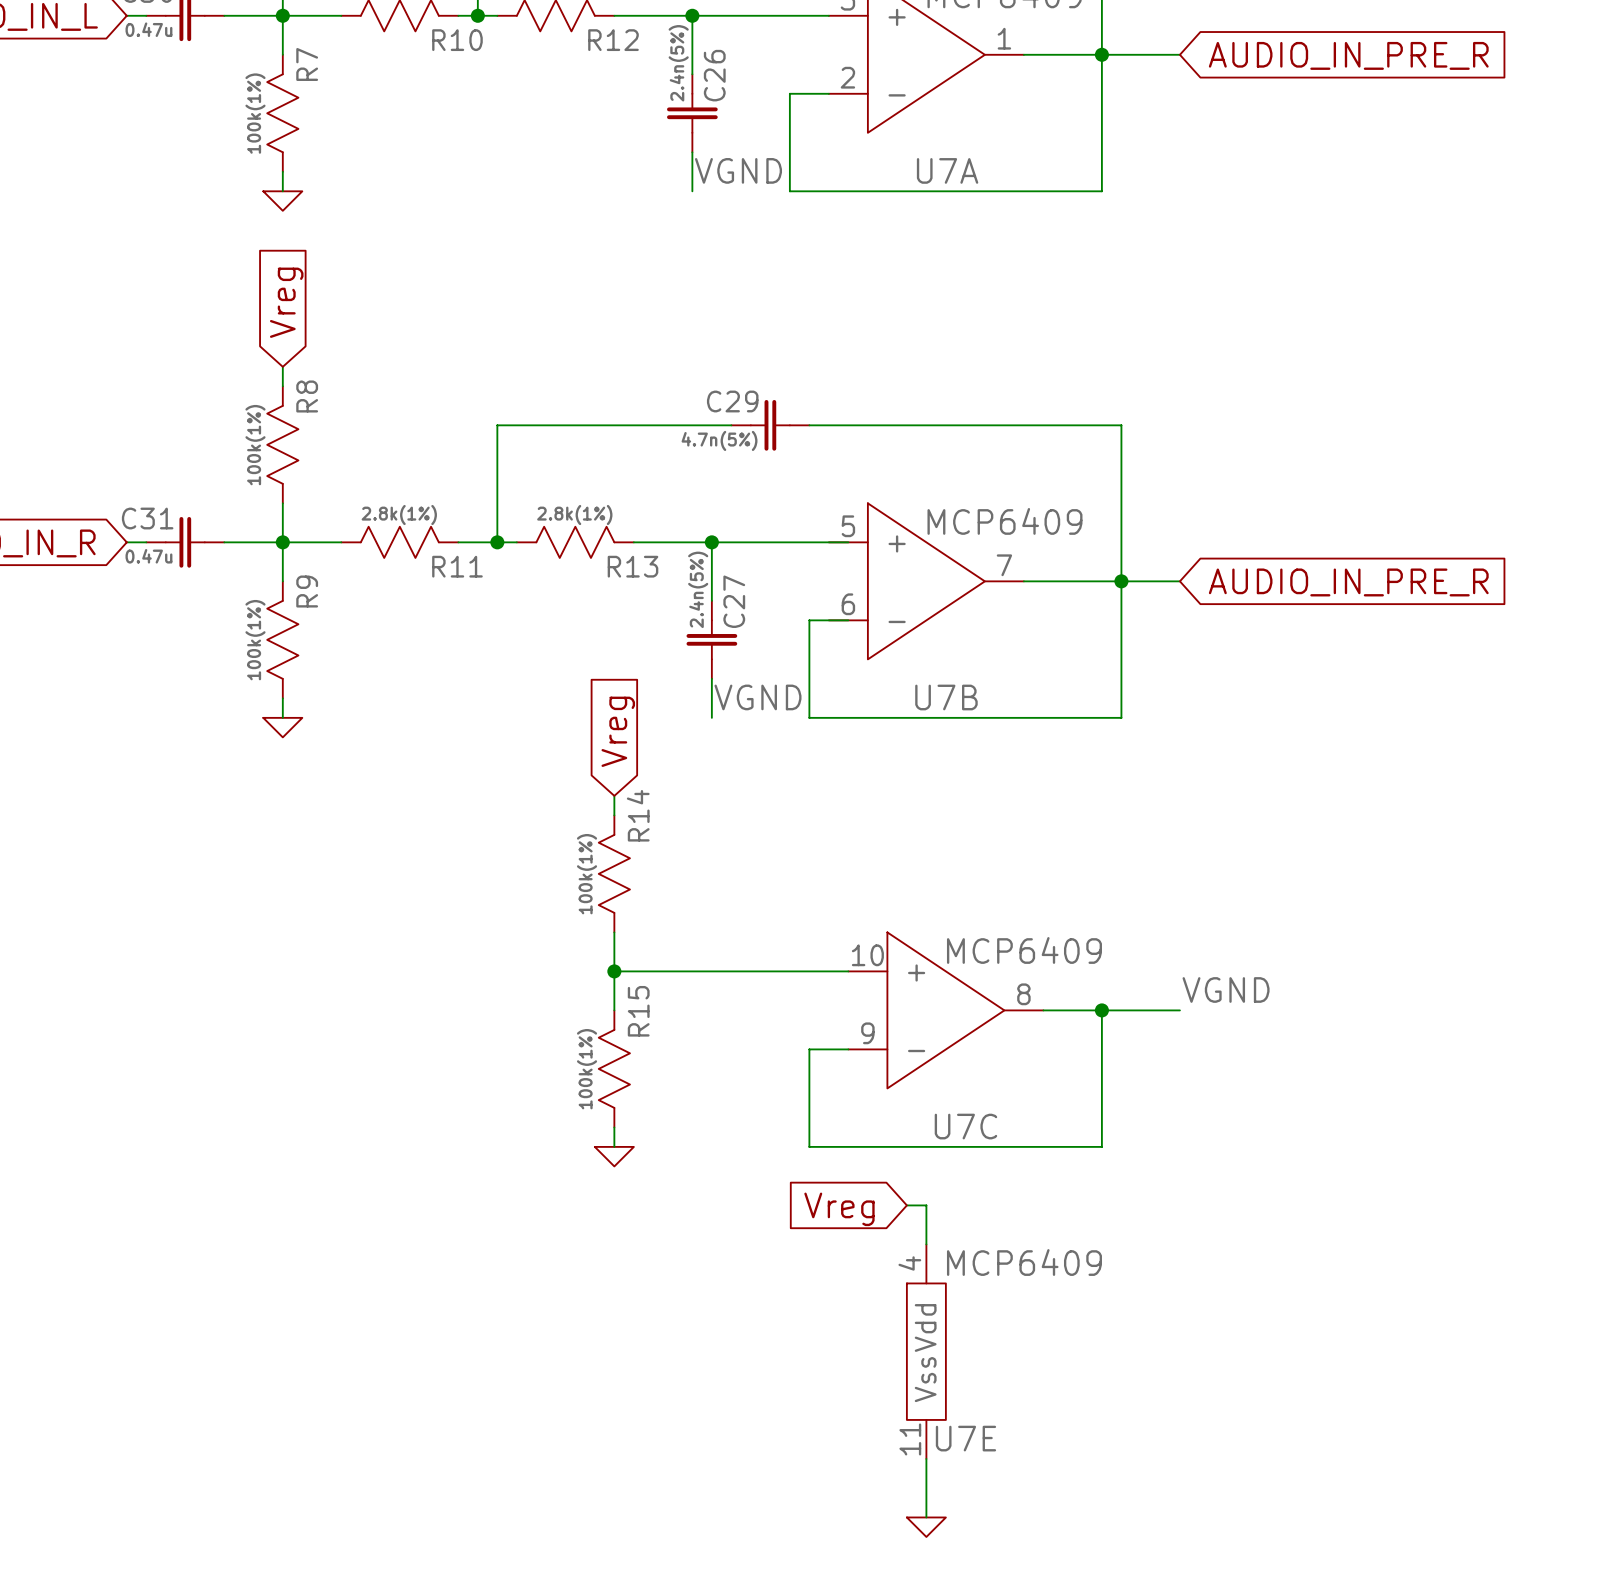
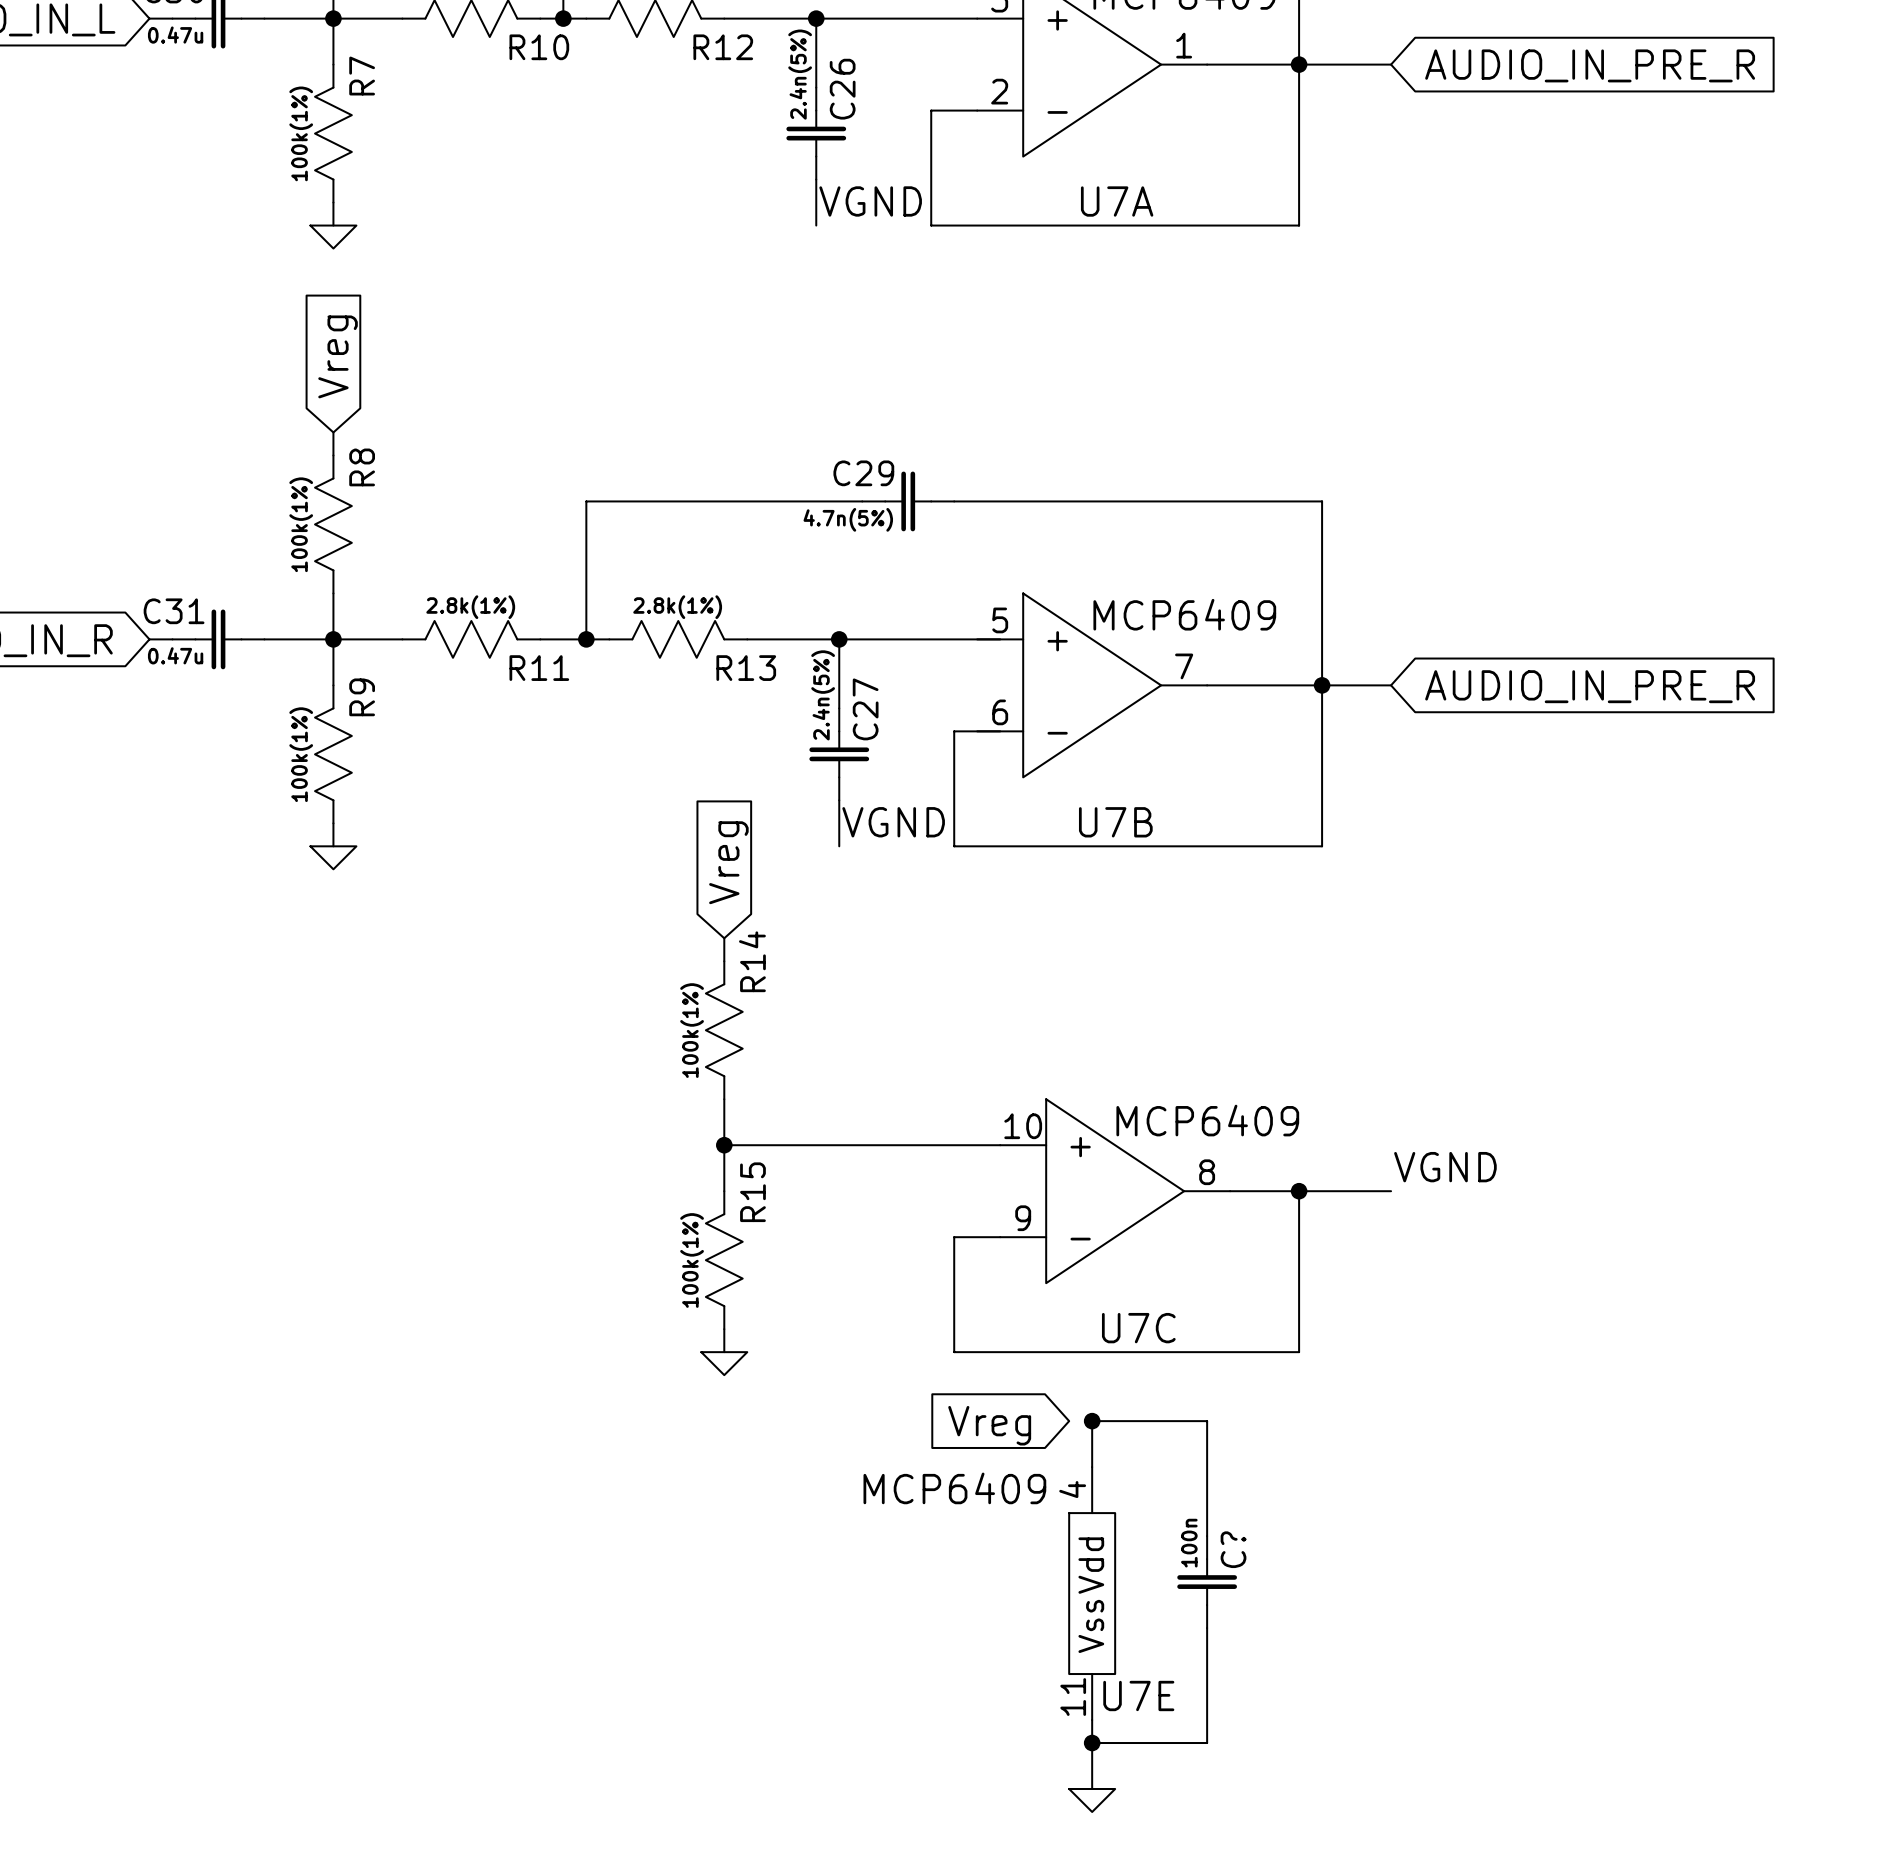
wire: (906, 1205) (926, 1205) -> (1207, 1536) (1207, 1421) (1092, 1421)
junction: none -> (1092, 1421)
U7E value position: MCP6409 (1024, 1262) -> MCP6409 (954, 1488)
C?: none -> 100n (1207, 1582)
wire: none -> (1207, 1628) (1207, 1743) (1092, 1743)
junction: none -> (1092, 1743)

